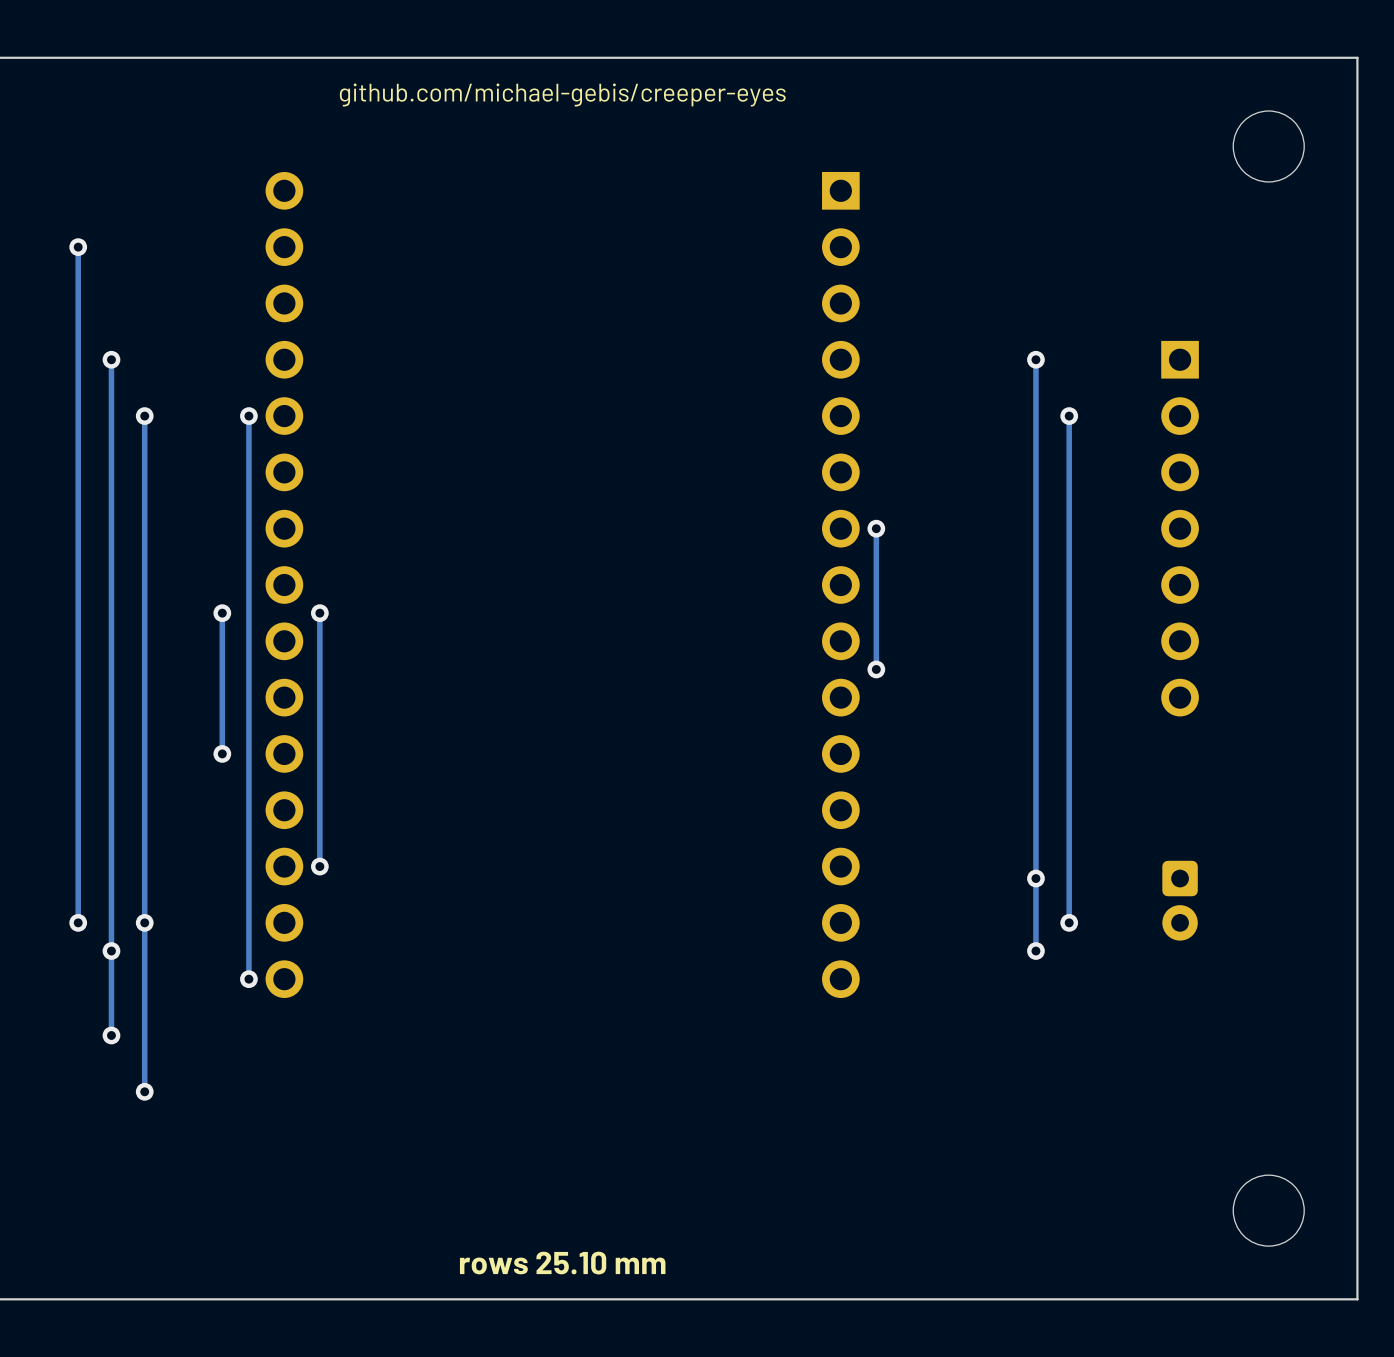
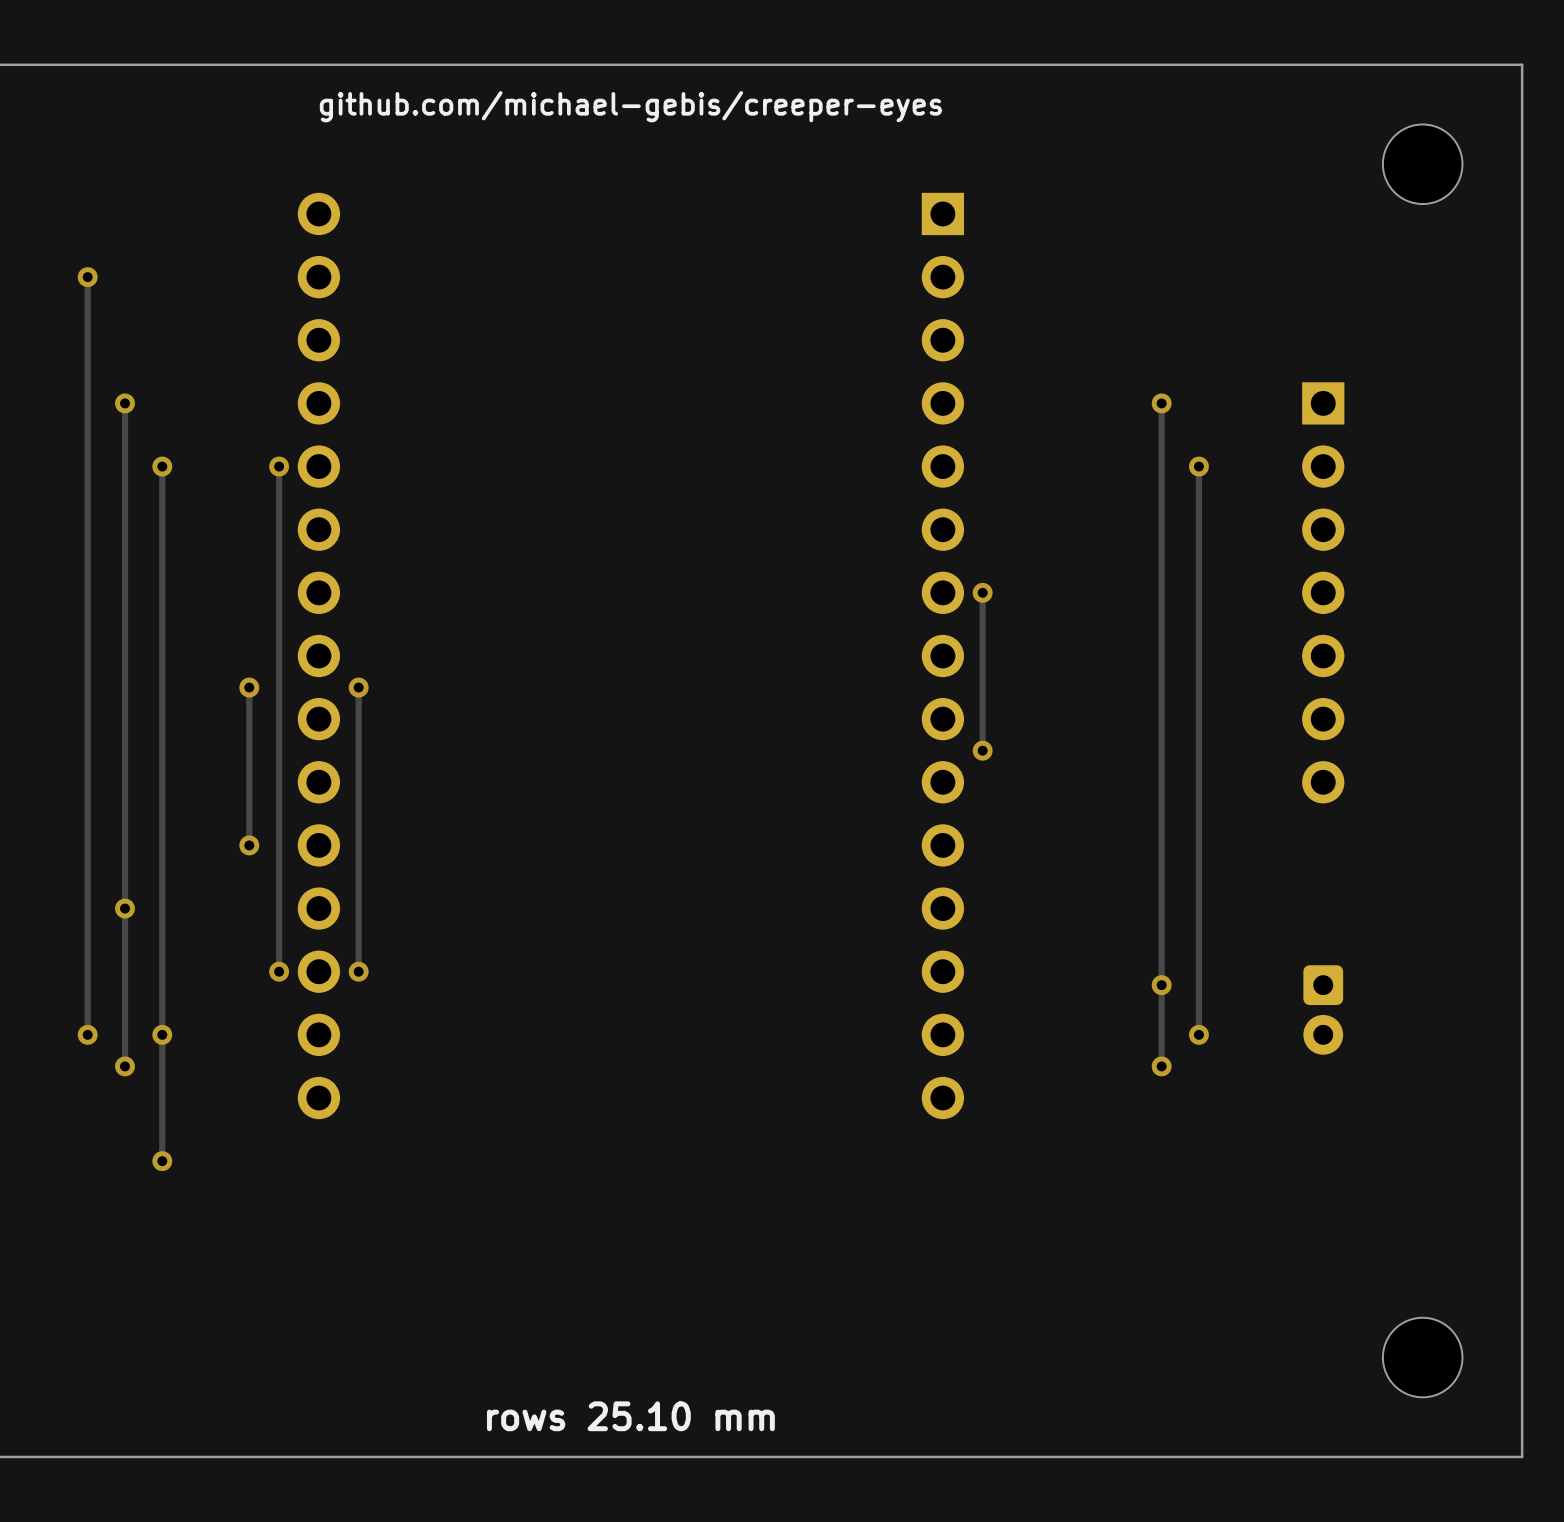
via: none -> (124, 908)
track: (248, 866) (248, 979) -> none
via: none -> (279, 971)
track: (111, 951) (111, 1035) -> none
via: (248, 979) -> none
via: (111, 1035) -> none
track: (144, 1035) (144, 1091) -> none
via: none -> (162, 1161)
via: (144, 1091) -> none

